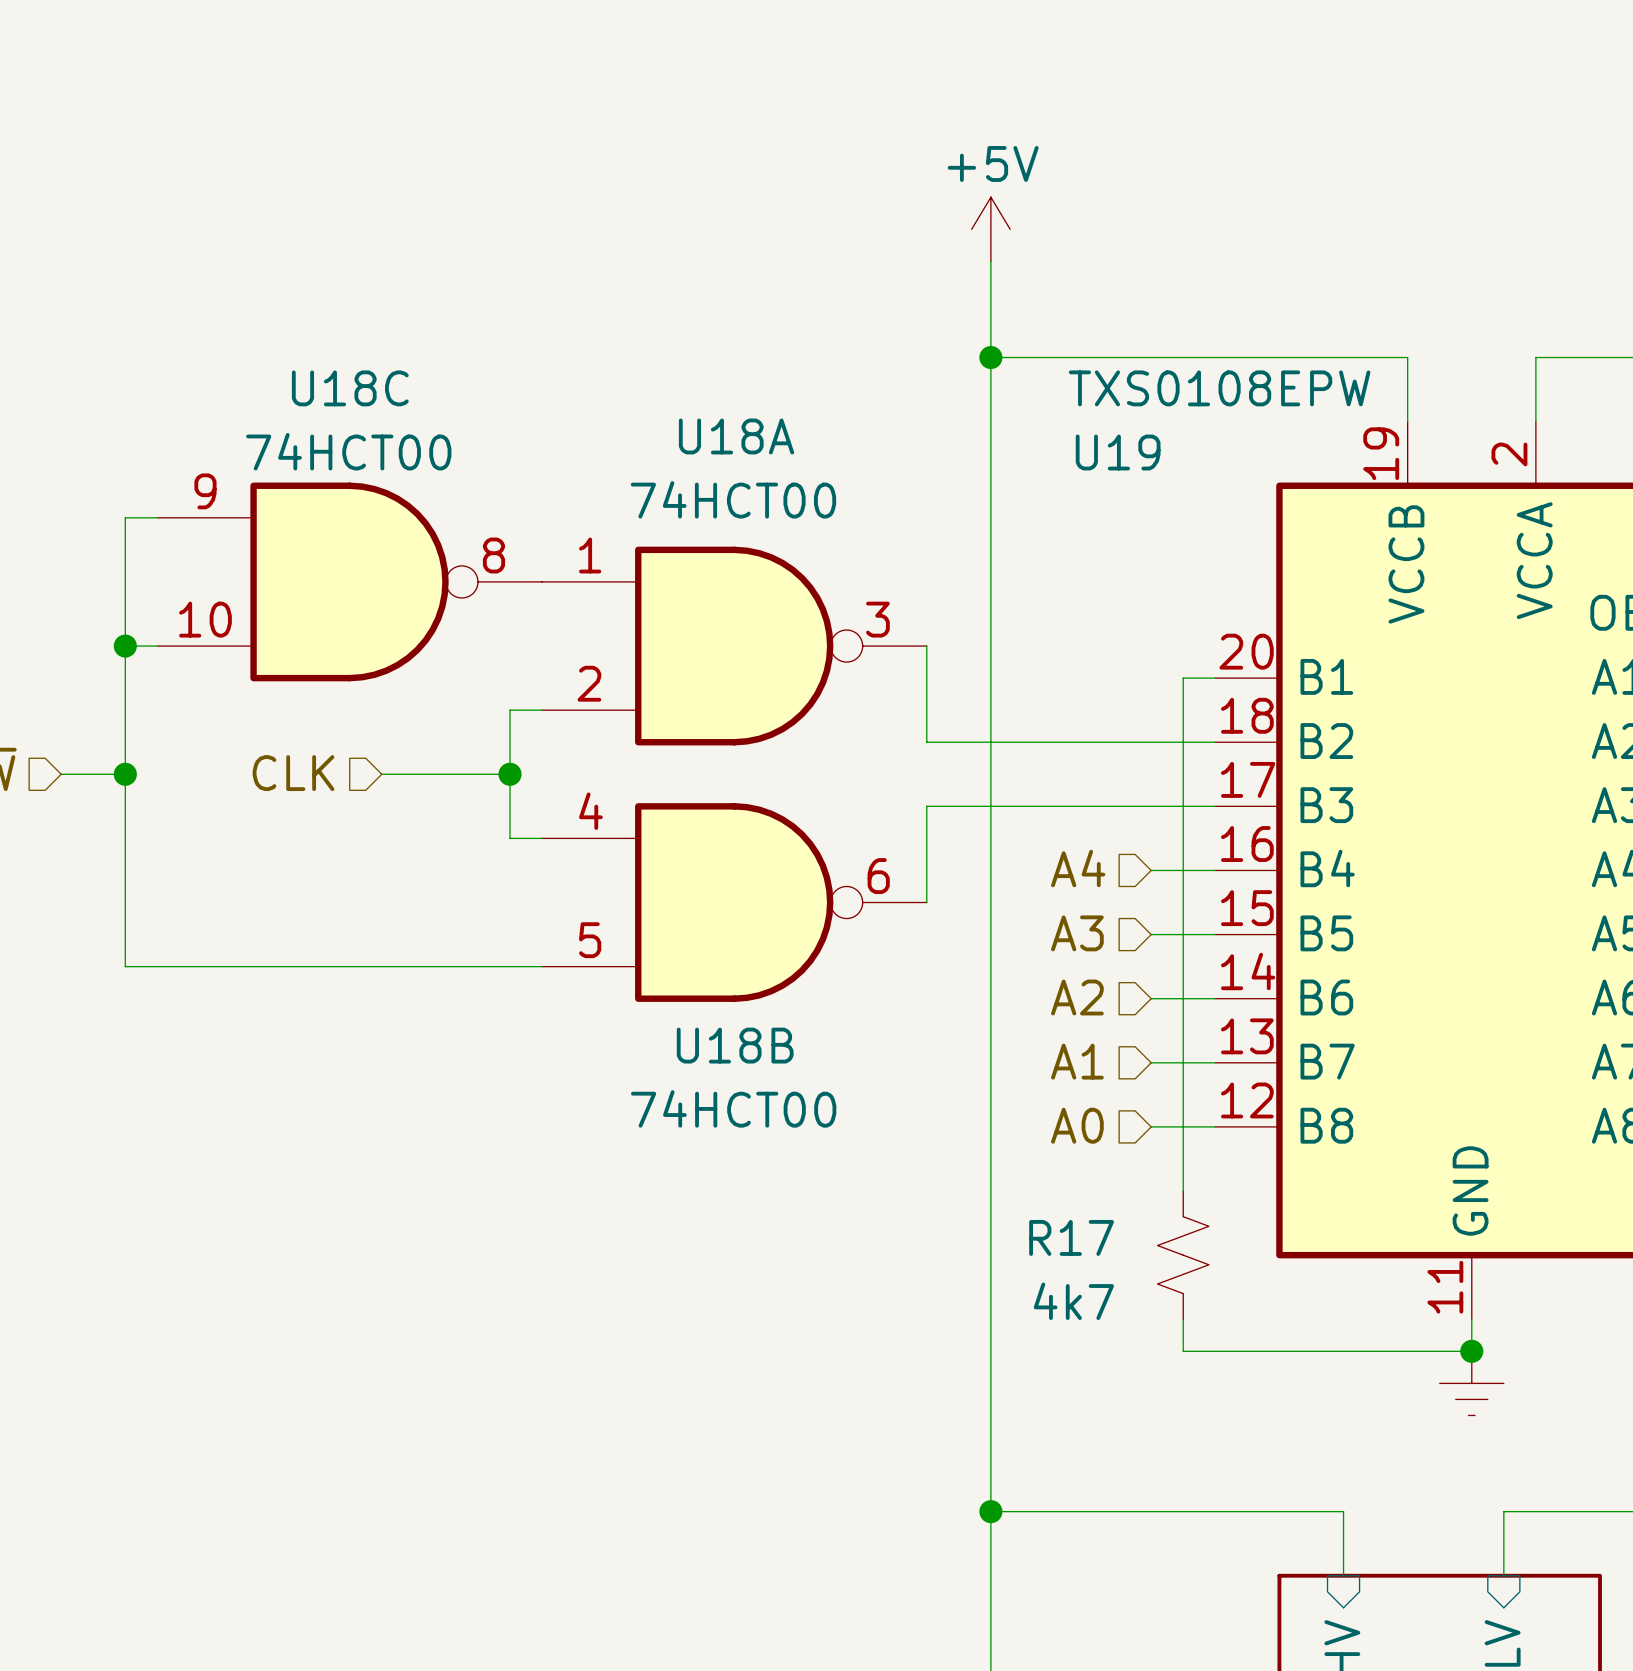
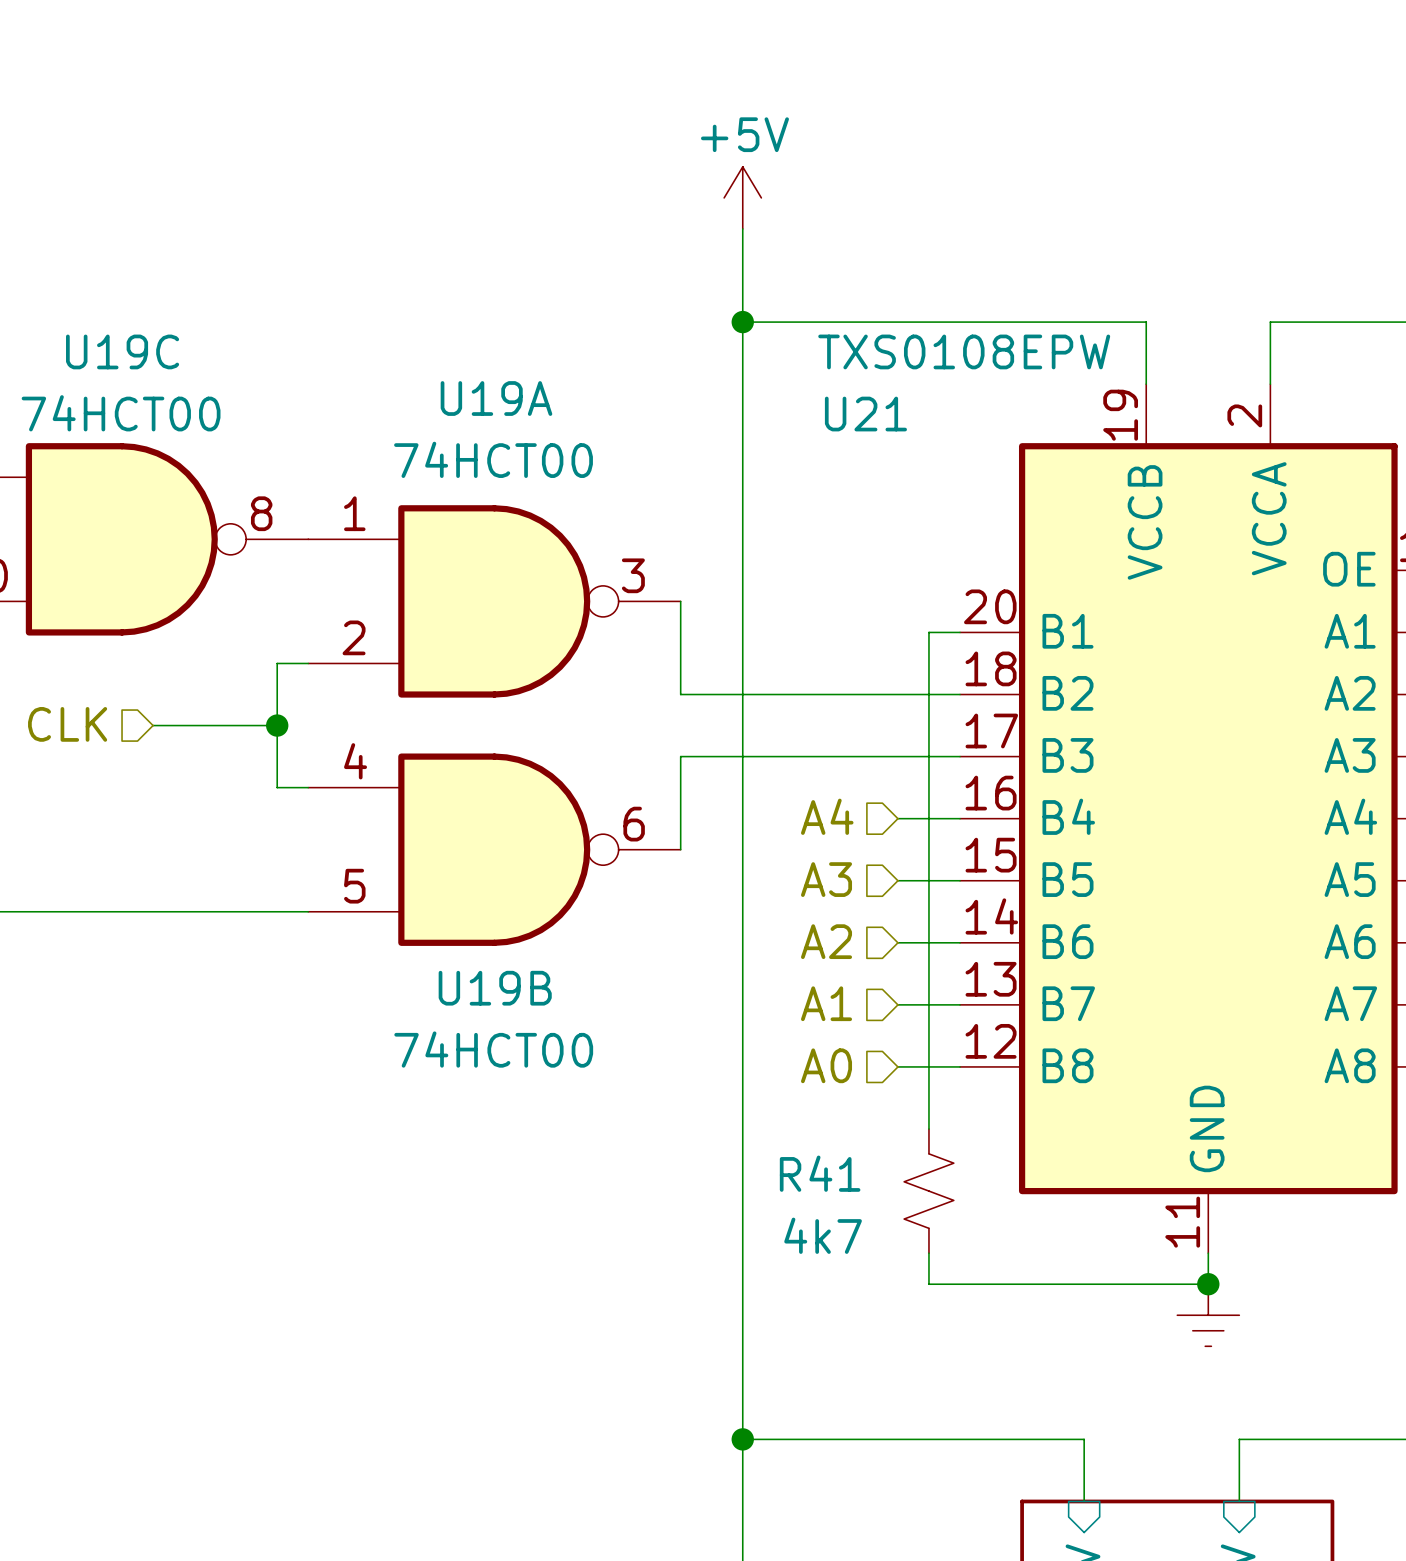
U18C name: U18C (350, 388) -> U19C (122, 351)
U18A name: U18A (736, 436) -> U19A (496, 398)
U19 name: U19 (1118, 452) -> U21 (865, 414)
U18B name: U18B (735, 1045) -> U19B (495, 988)
R17 name: R17 (1071, 1237) -> R41 (820, 1173)

